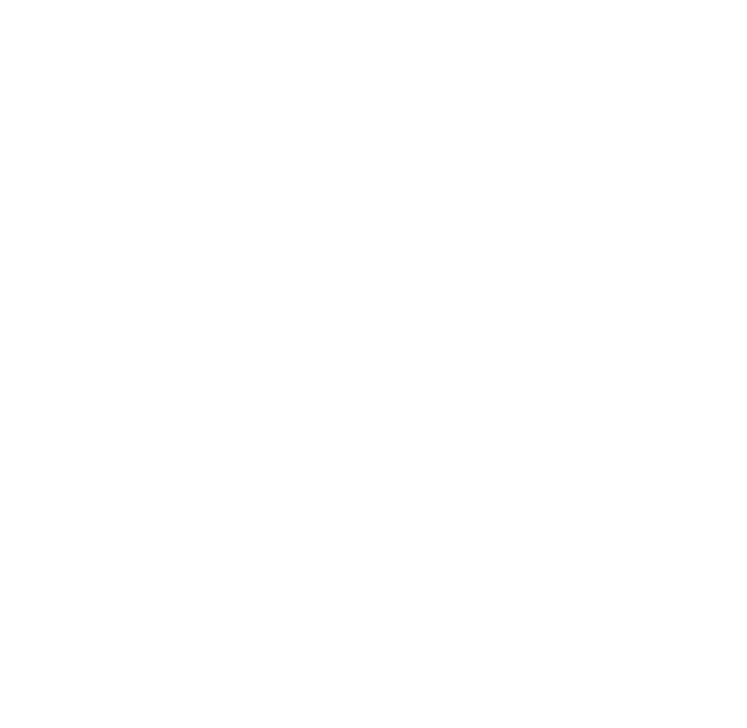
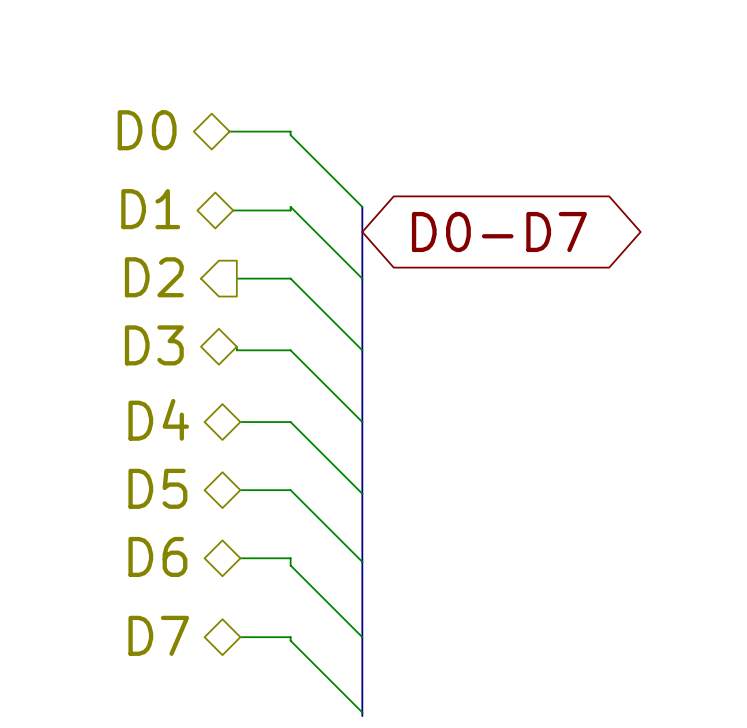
hierarchical label: none -> D0 (147, 130)
wire: none -> (229, 131) (290, 131) (290, 135) (362, 206)
bus: none -> (362, 206) (362, 716)
hierarchical label: none -> D1 (150, 209)
wire: none -> (233, 210) (290, 210) (290, 206) (362, 278)
global label: none -> D0-D7 (499, 231)
hierarchical label: none -> D2 (154, 277)
wire: none -> (236, 278) (290, 278) (362, 350)
hierarchical label: none -> D3 (154, 345)
wire: none -> (236, 346) (236, 350) (290, 350) (362, 422)
hierarchical label: none -> D4 (158, 419)
wire: none -> (240, 422) (290, 422) (362, 493)
hierarchical label: none -> D5 (157, 488)
wire: none -> (240, 490) (290, 490) (362, 561)
hierarchical label: none -> D6 (157, 556)
wire: none -> (240, 558) (290, 558) (290, 565) (362, 637)
hierarchical label: none -> D7 (158, 635)
wire: none -> (240, 637) (290, 637) (290, 640) (362, 712)

